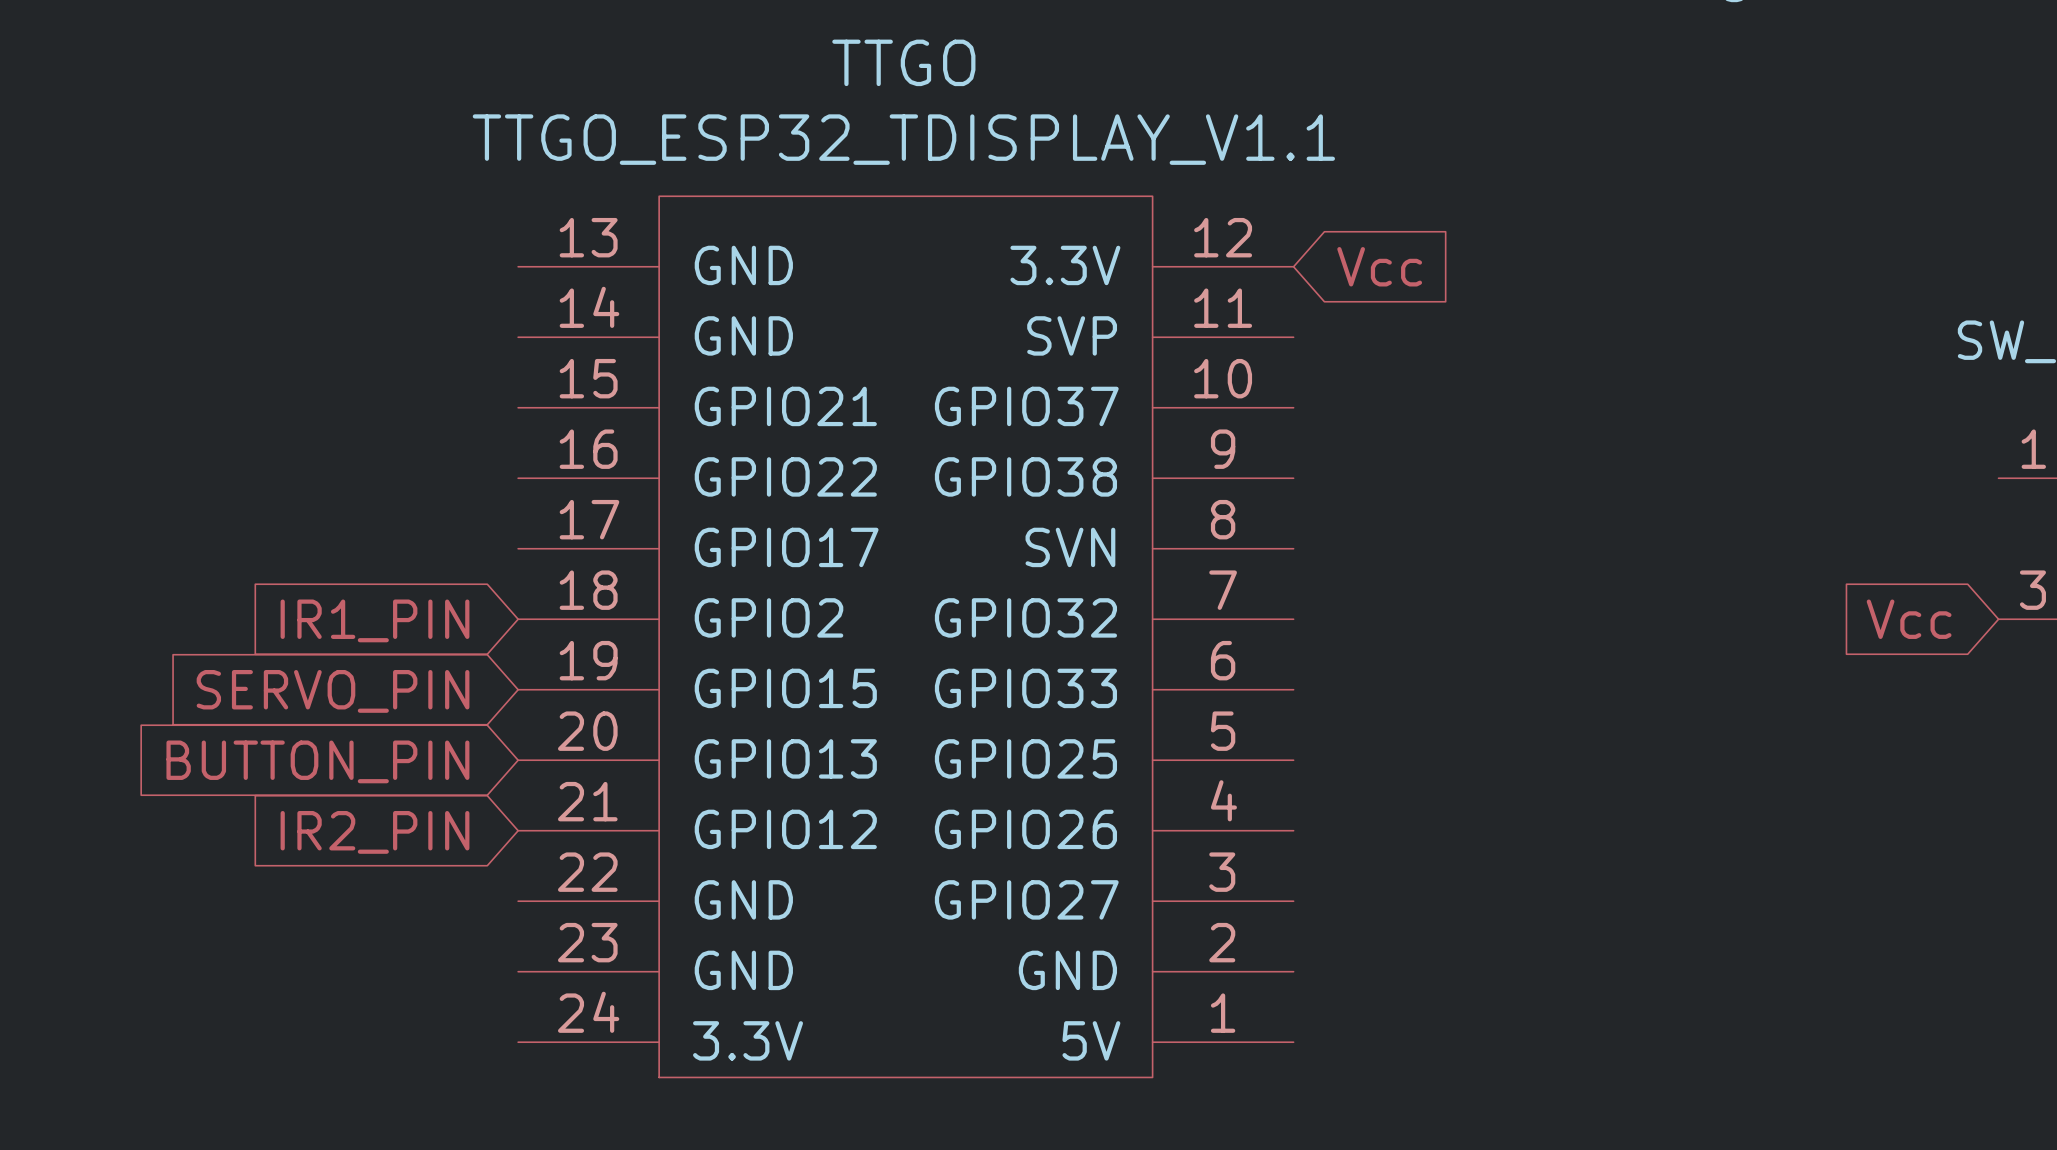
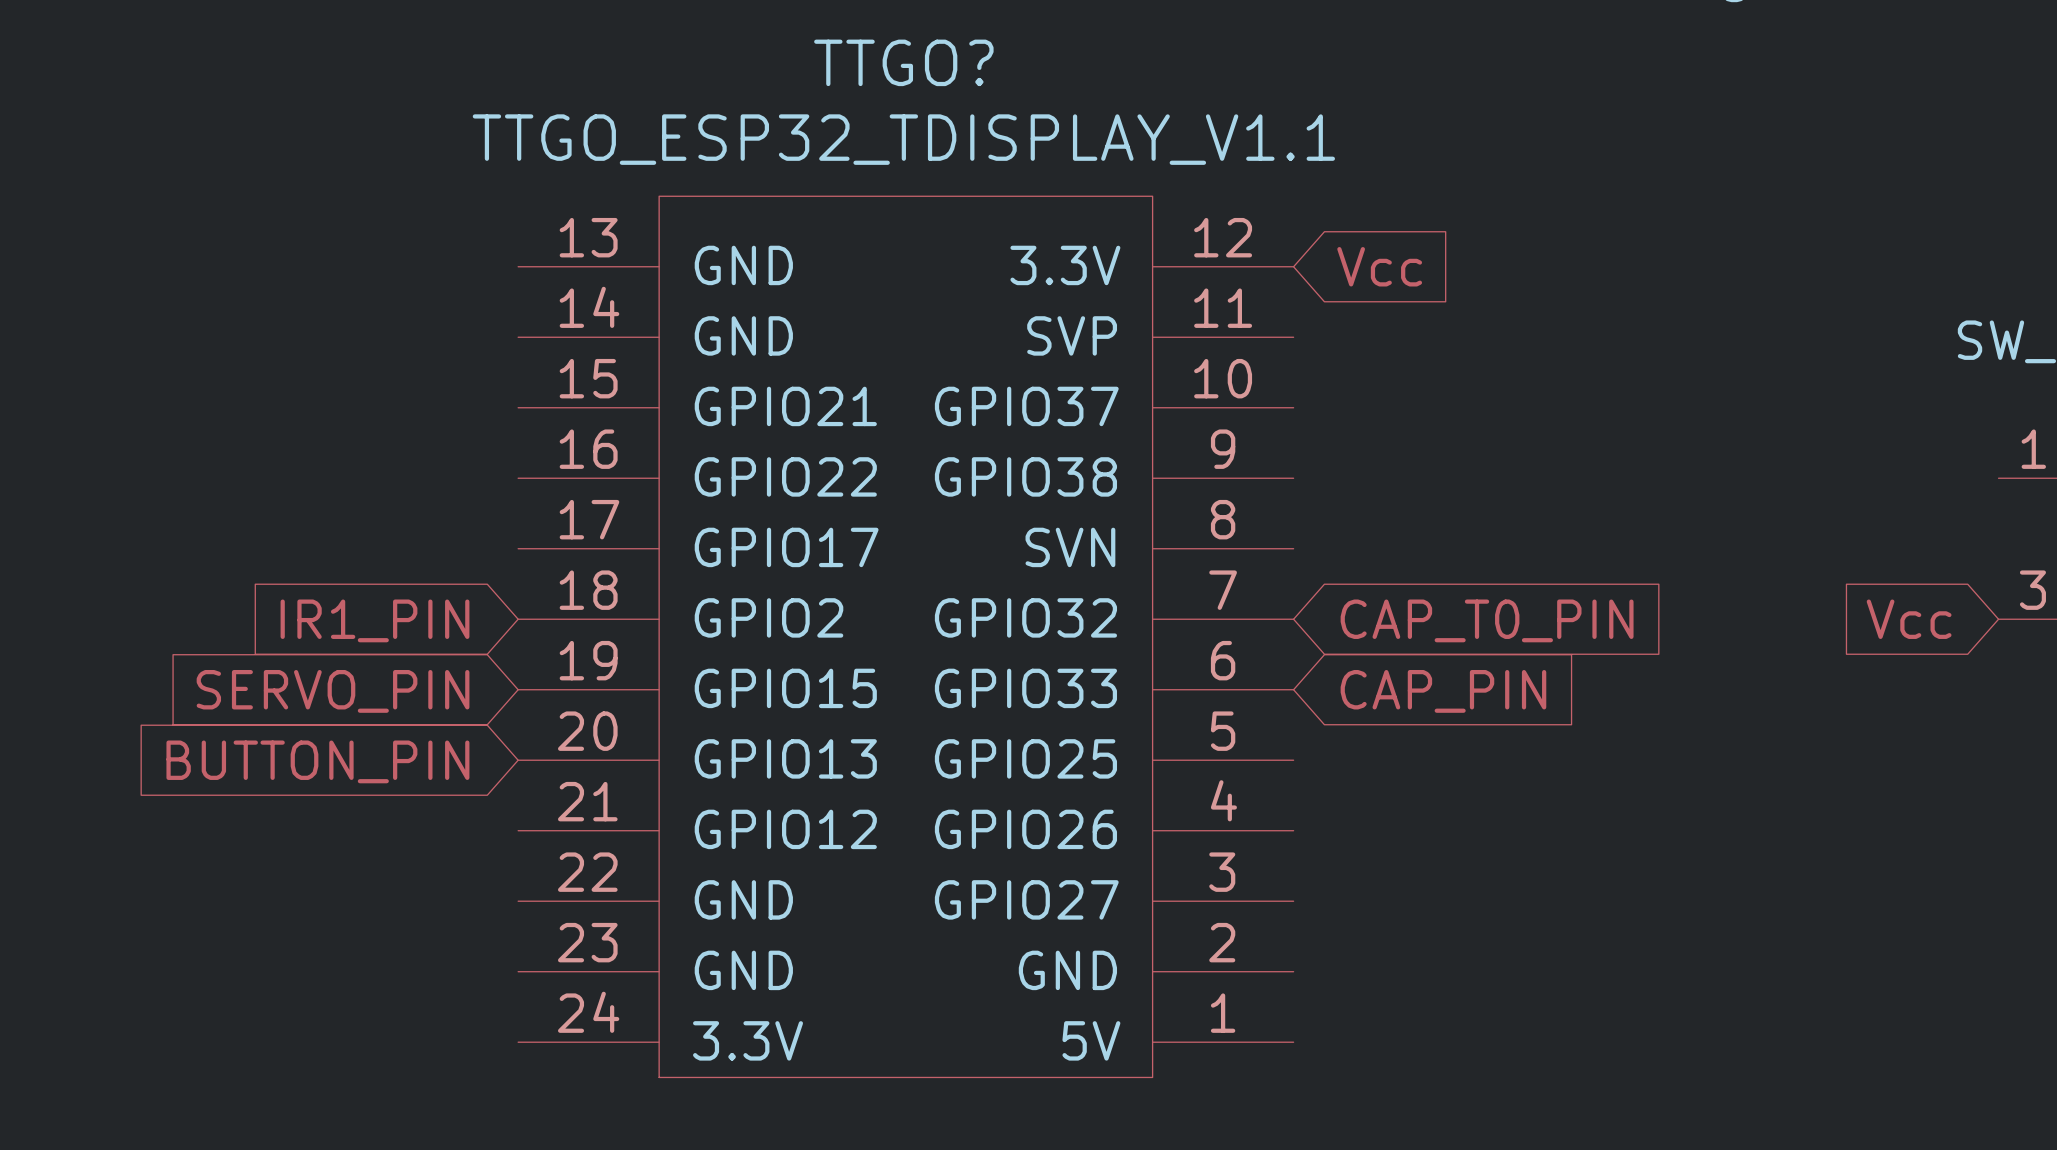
TTGO name: TTGO (903, 62) -> TTGO? (903, 62)
global label: none -> CAP_T0_PIN (1487, 620)
global label: none -> CAP_PIN (1443, 691)
global label: IR2_PIN (375, 832) -> none

